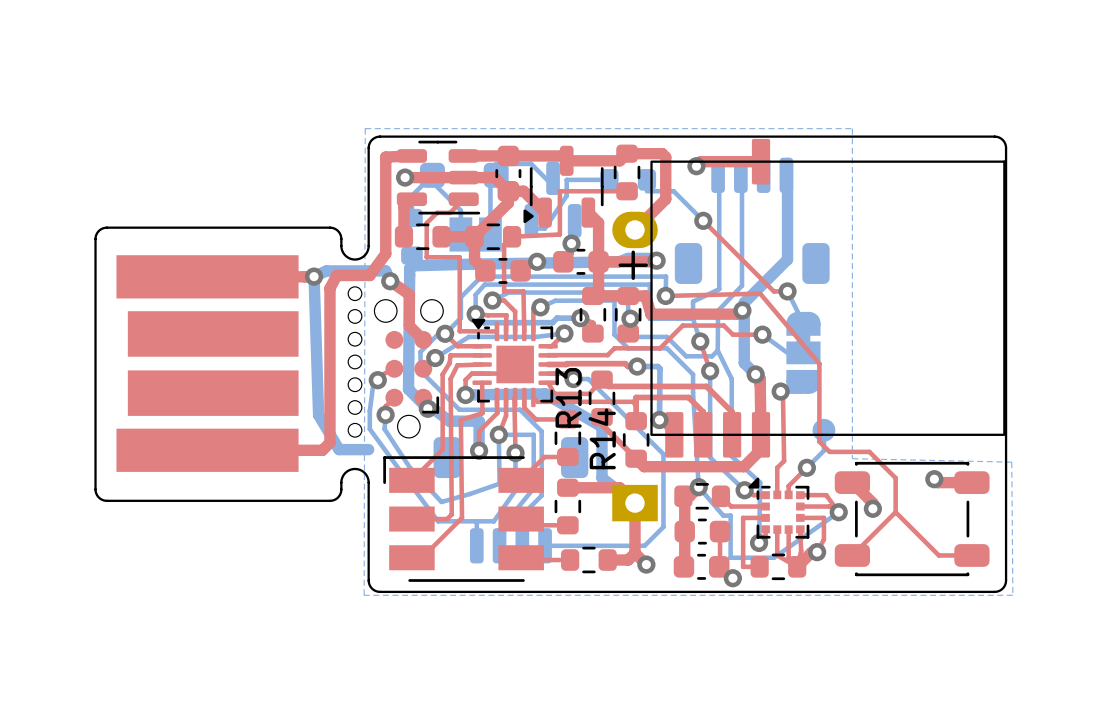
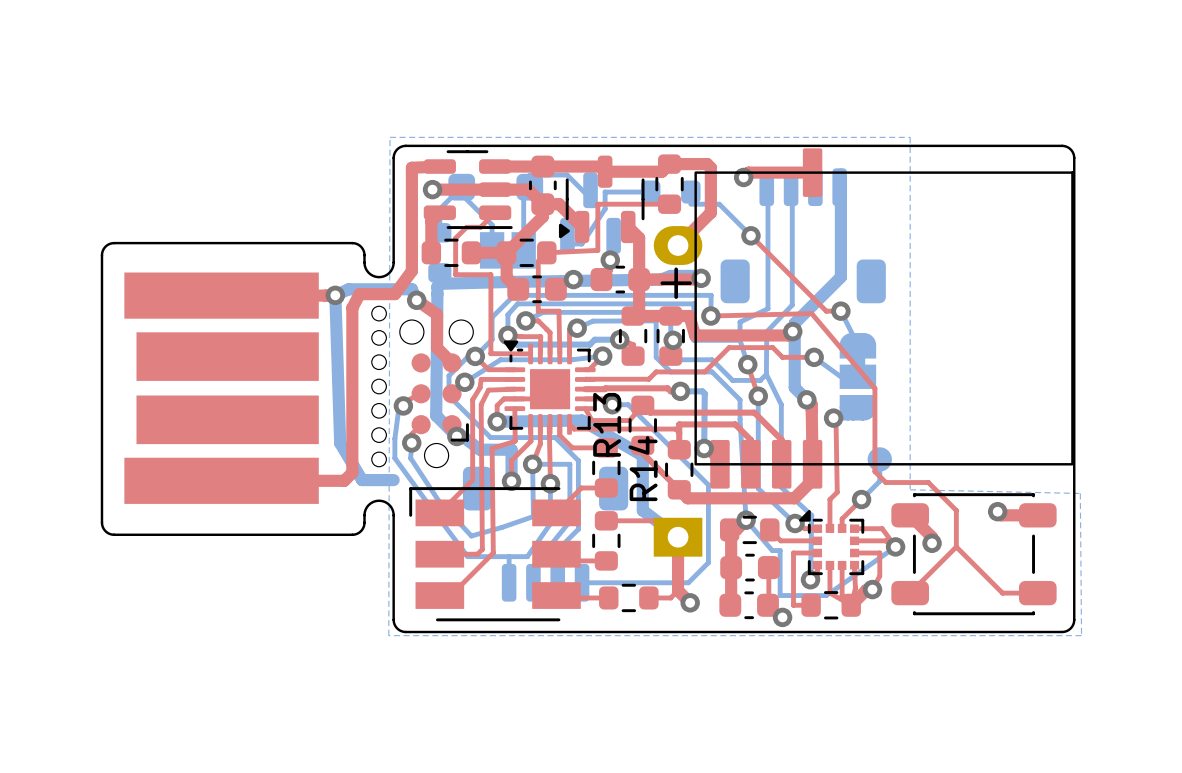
top track width: thick (567, 487) (619, 487) (635, 503) -> thin (606, 520) (661, 520) (678, 537)
top track width: thick (635, 553) (628, 560) (607, 560) -> thin (678, 590) (670, 597) (648, 597)

